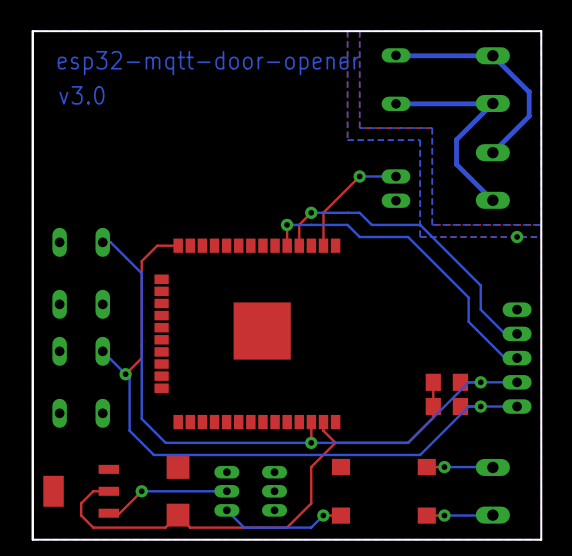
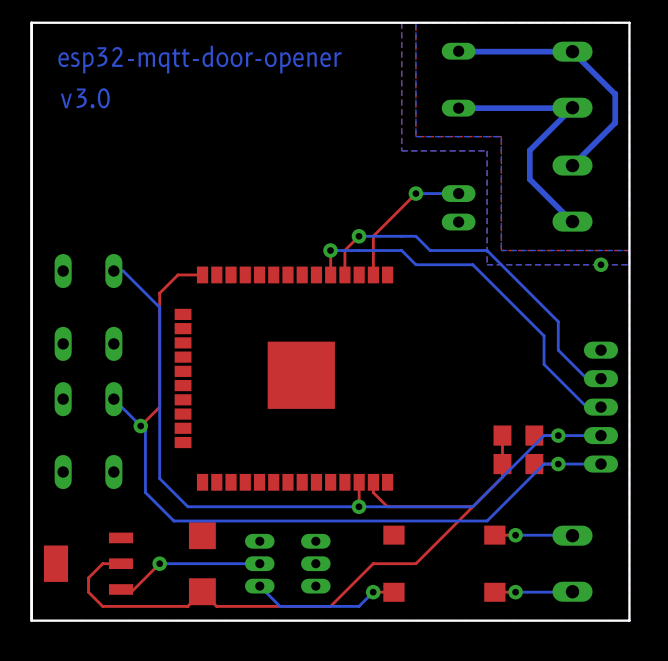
top track: (335, 442) (311, 467) (311, 503) -> (472, 506) (415, 563) (373, 563) (358, 577)

